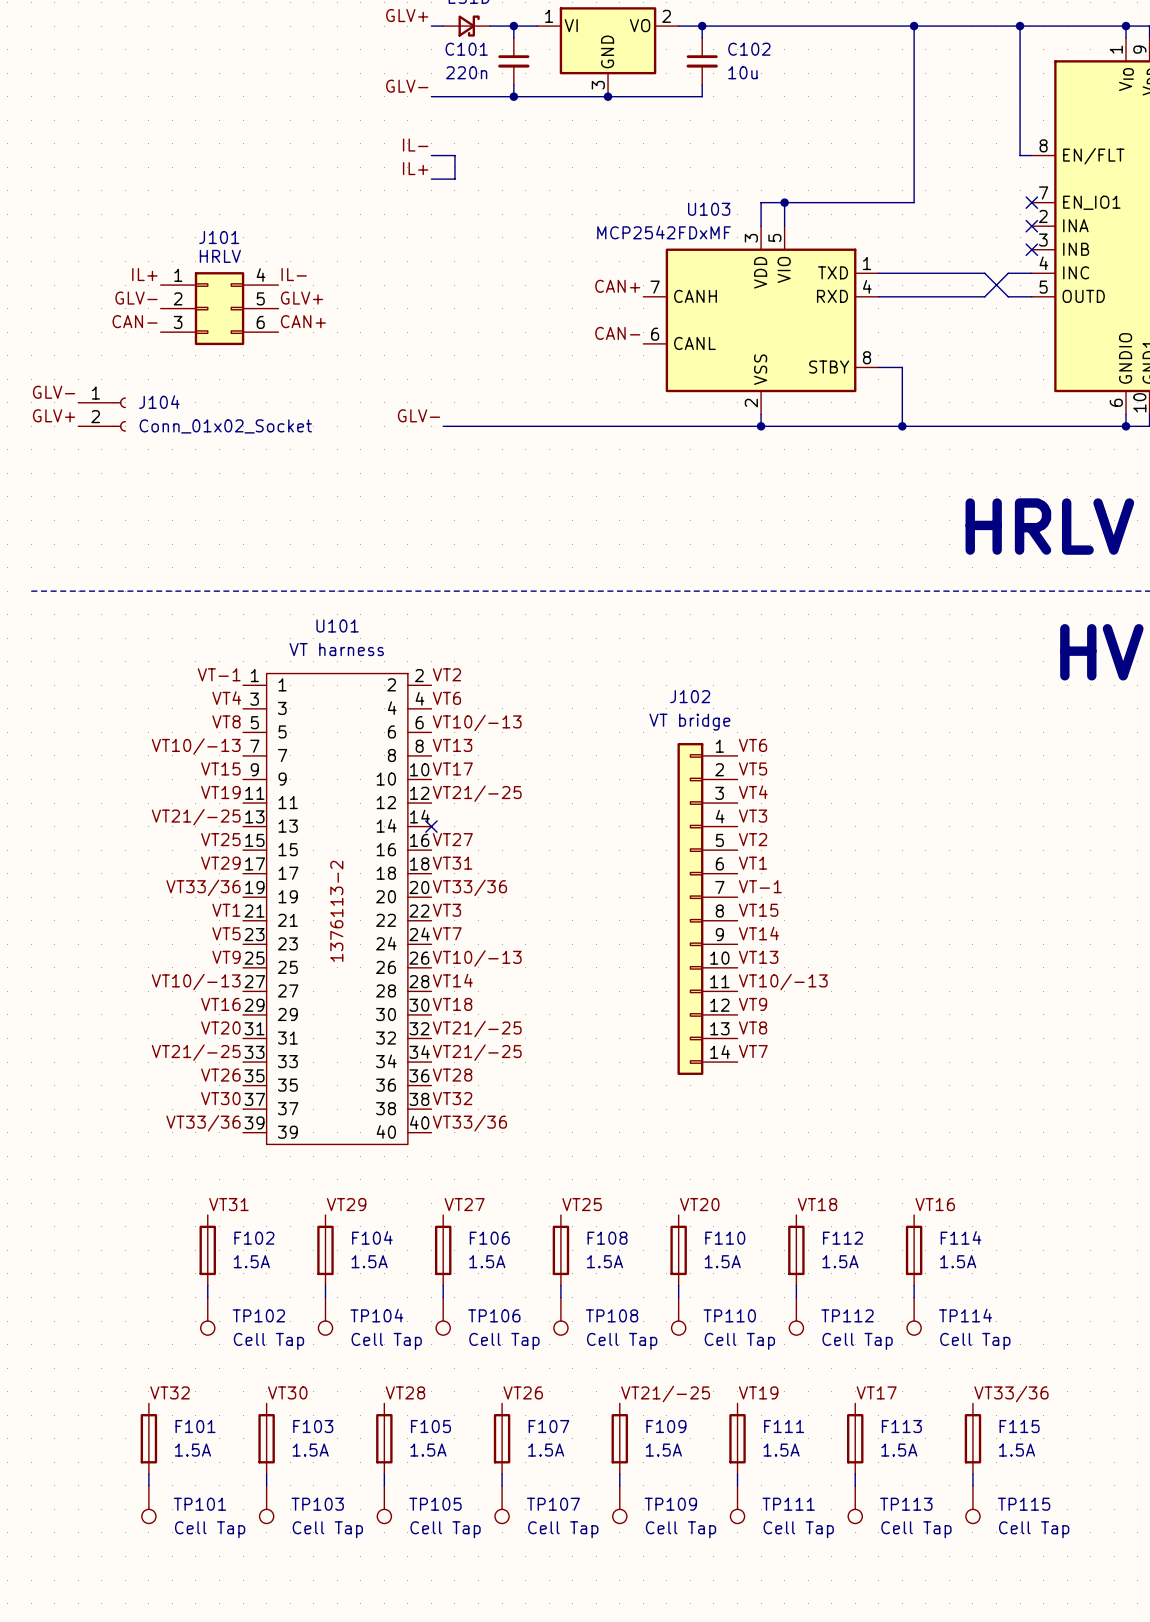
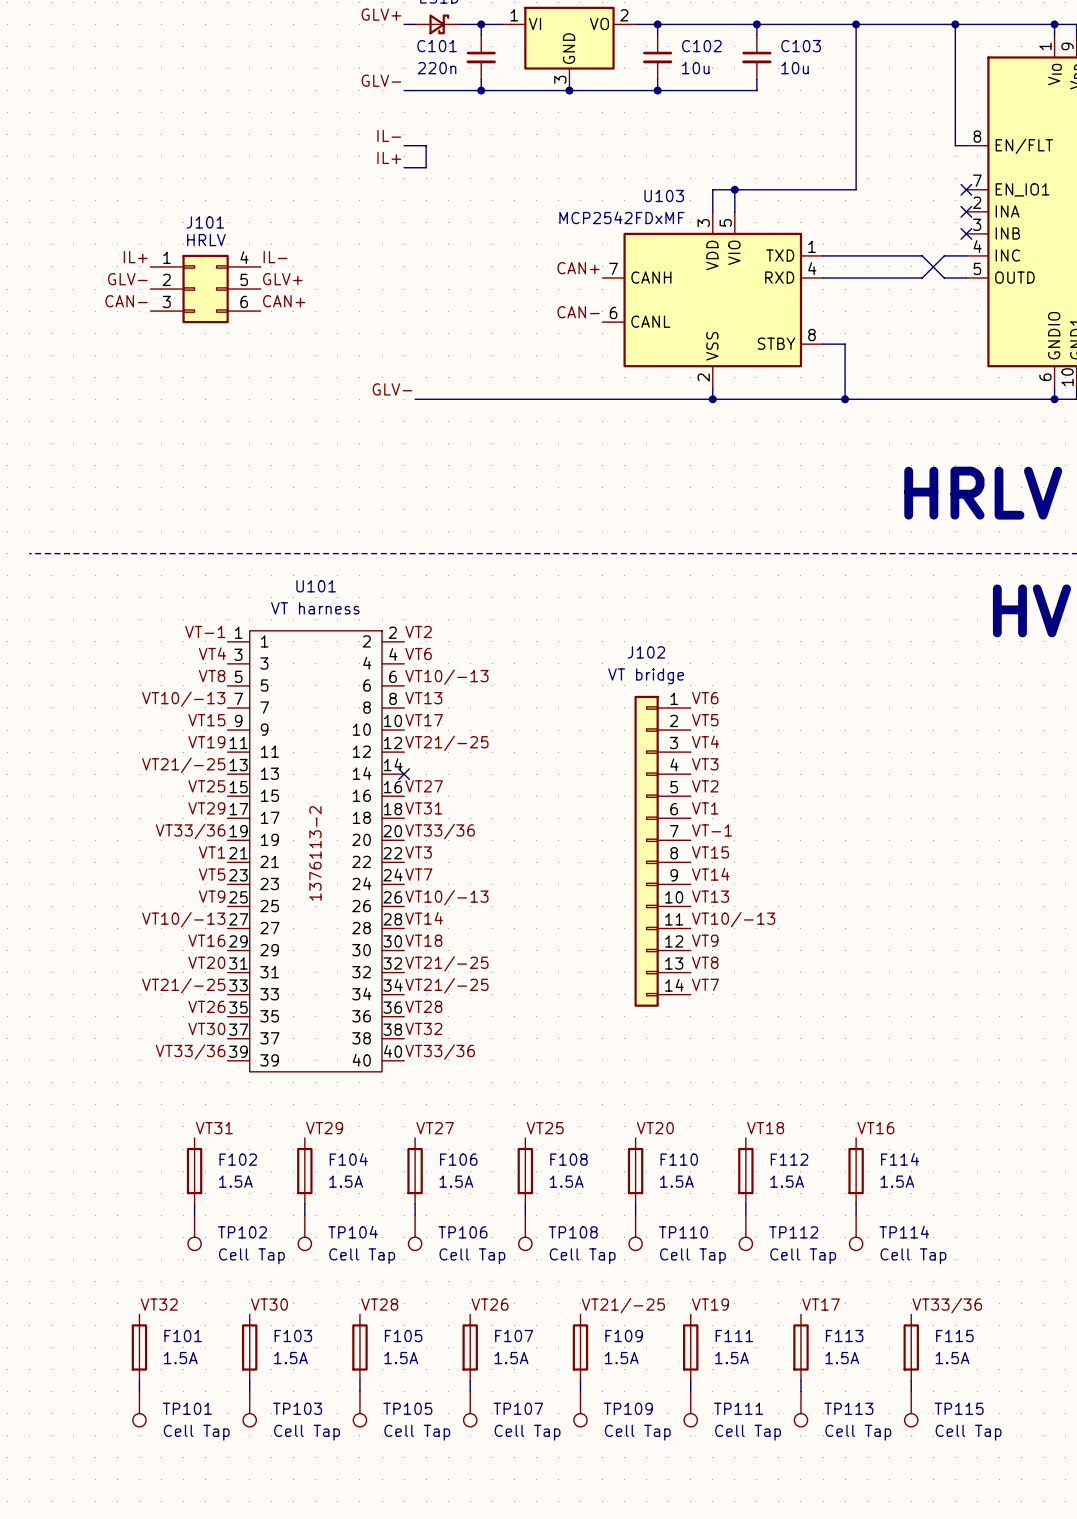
wire: none -> (756, 24) (756, 35)
junction: none -> (756, 24)
C103: none -> 10u (756, 57)
wire: none -> (756, 79) (756, 90) (657, 90)
junction: none -> (657, 90)
label: GLV- (54, 392) -> none
J104: Conn_01x02_Socket (102, 414) -> none
label: GLV+ (54, 415) -> none

